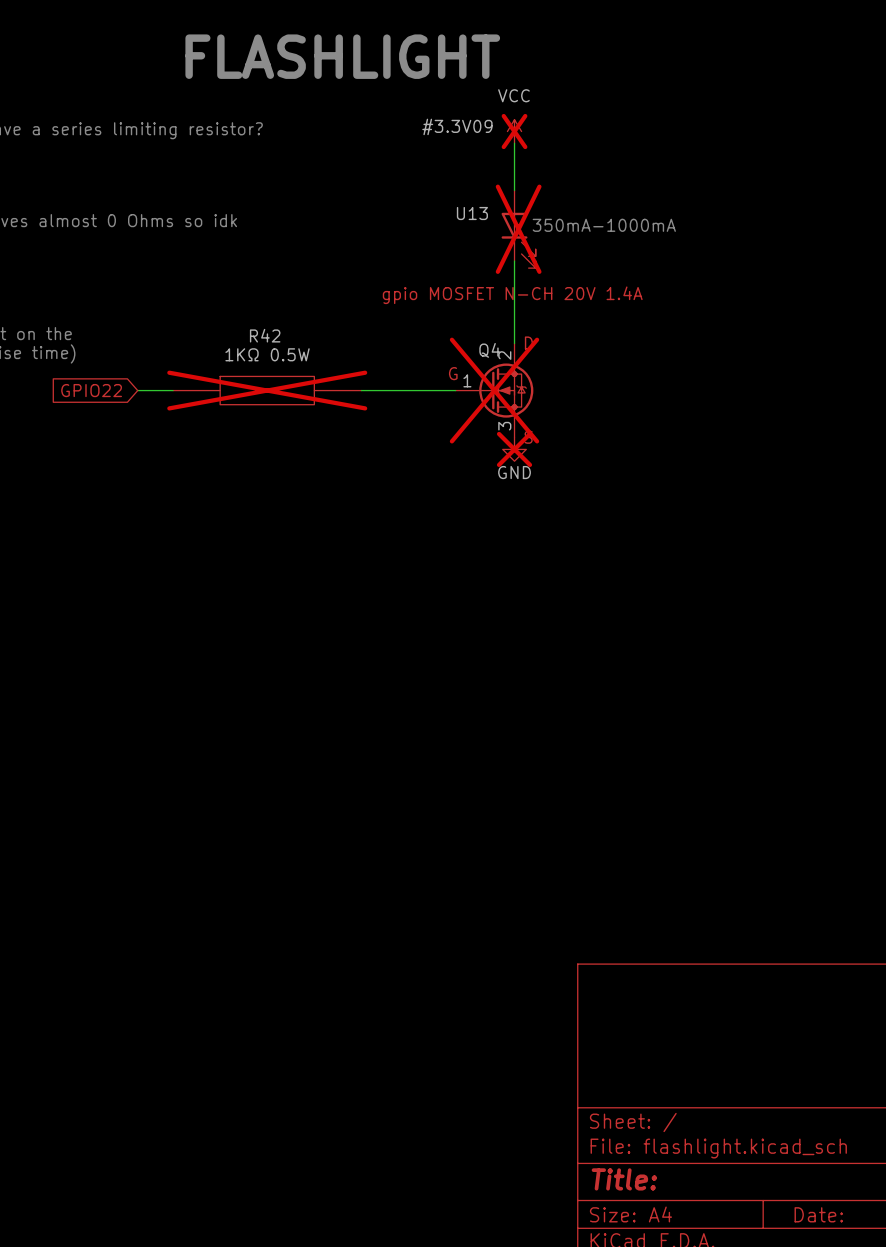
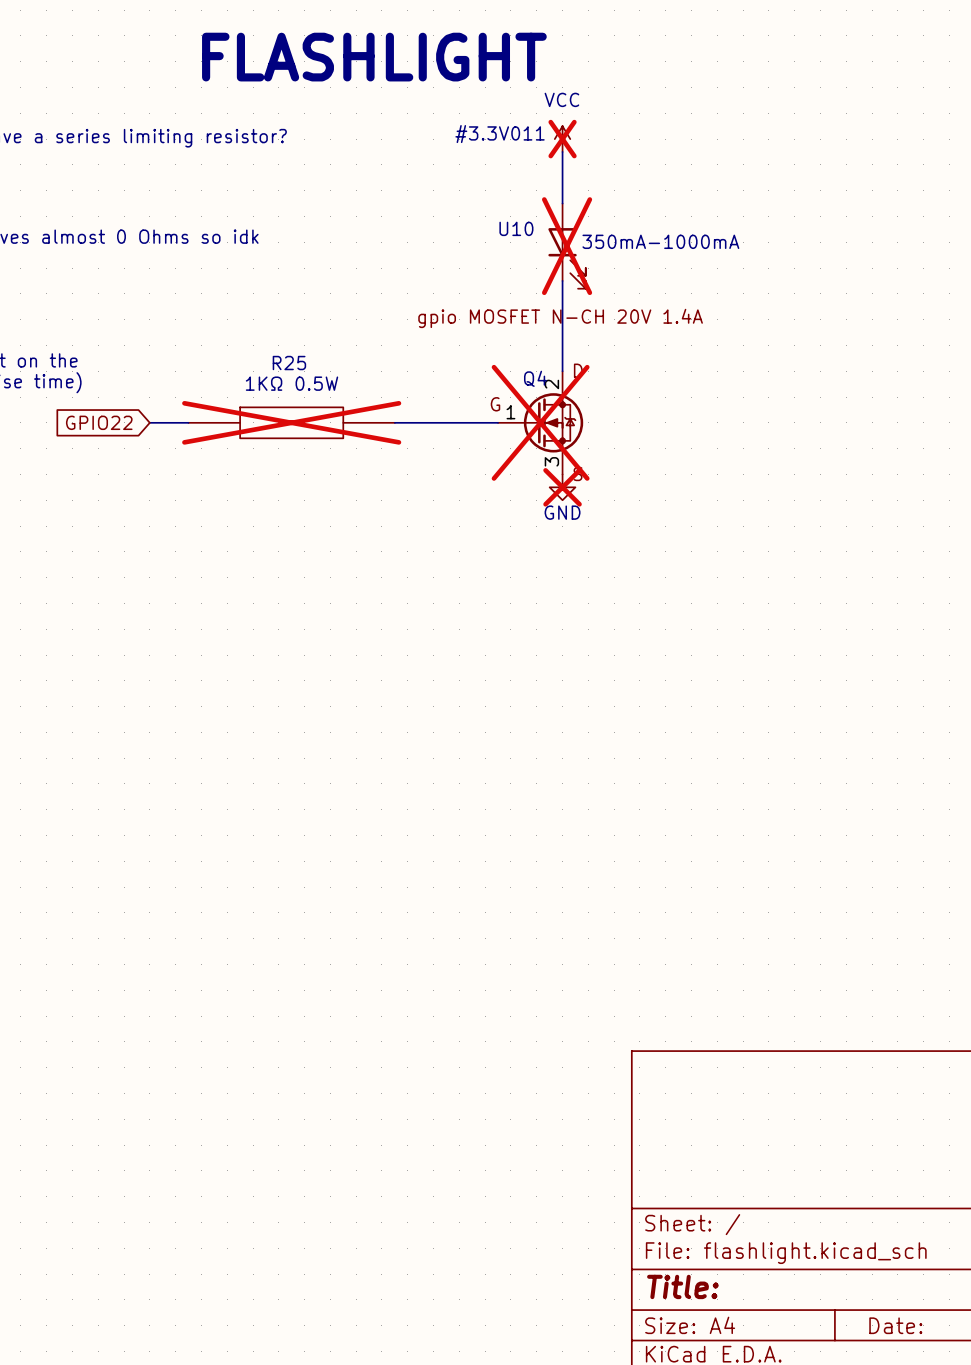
#3.3V09 name: #3.3V09 (457, 126) -> #3.3V011 (500, 134)
U13 name: U13 (472, 213) -> U10 (516, 228)
R42 name: R42 (265, 335) -> R25 (289, 363)

